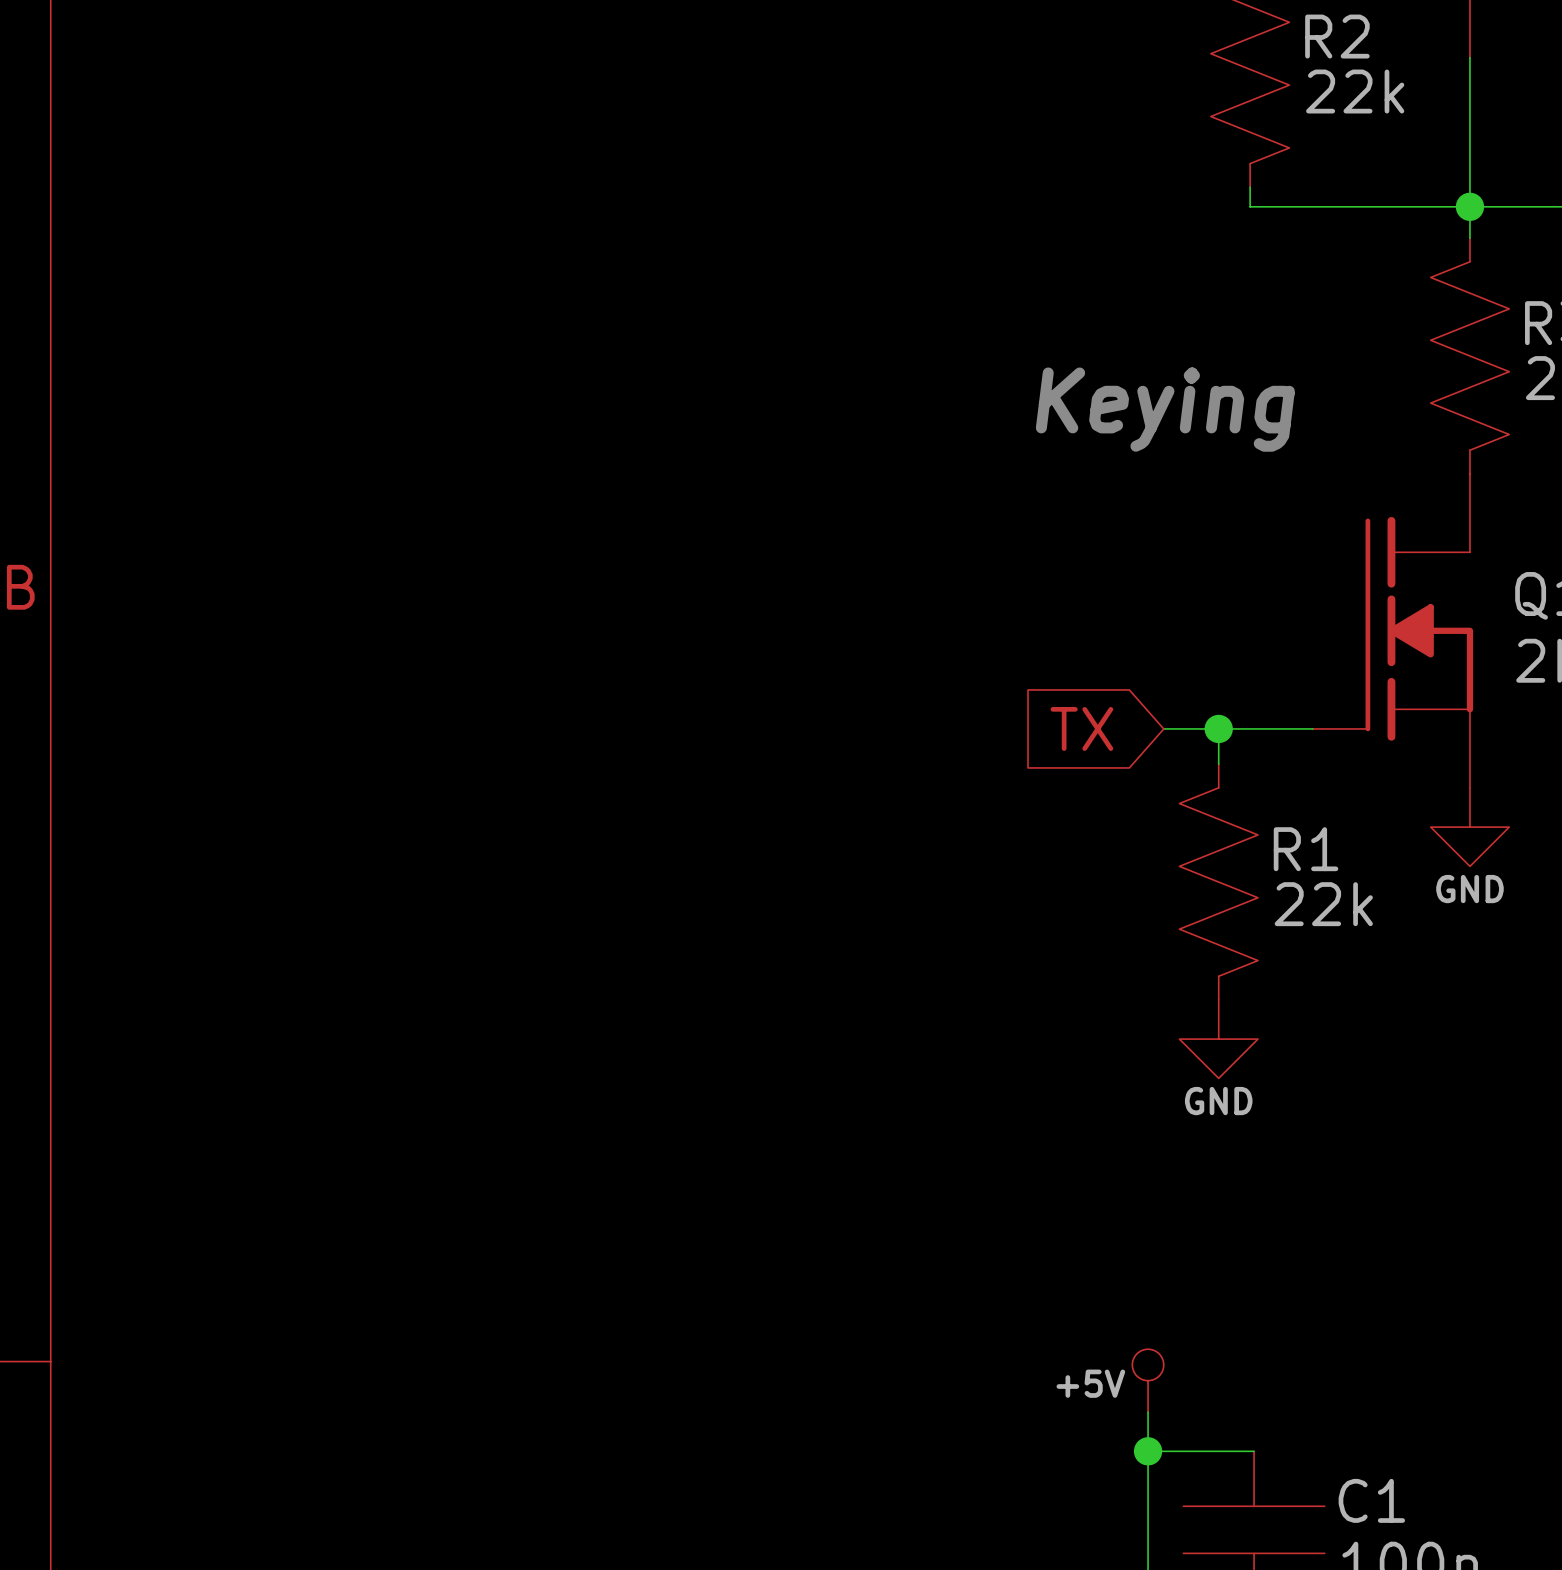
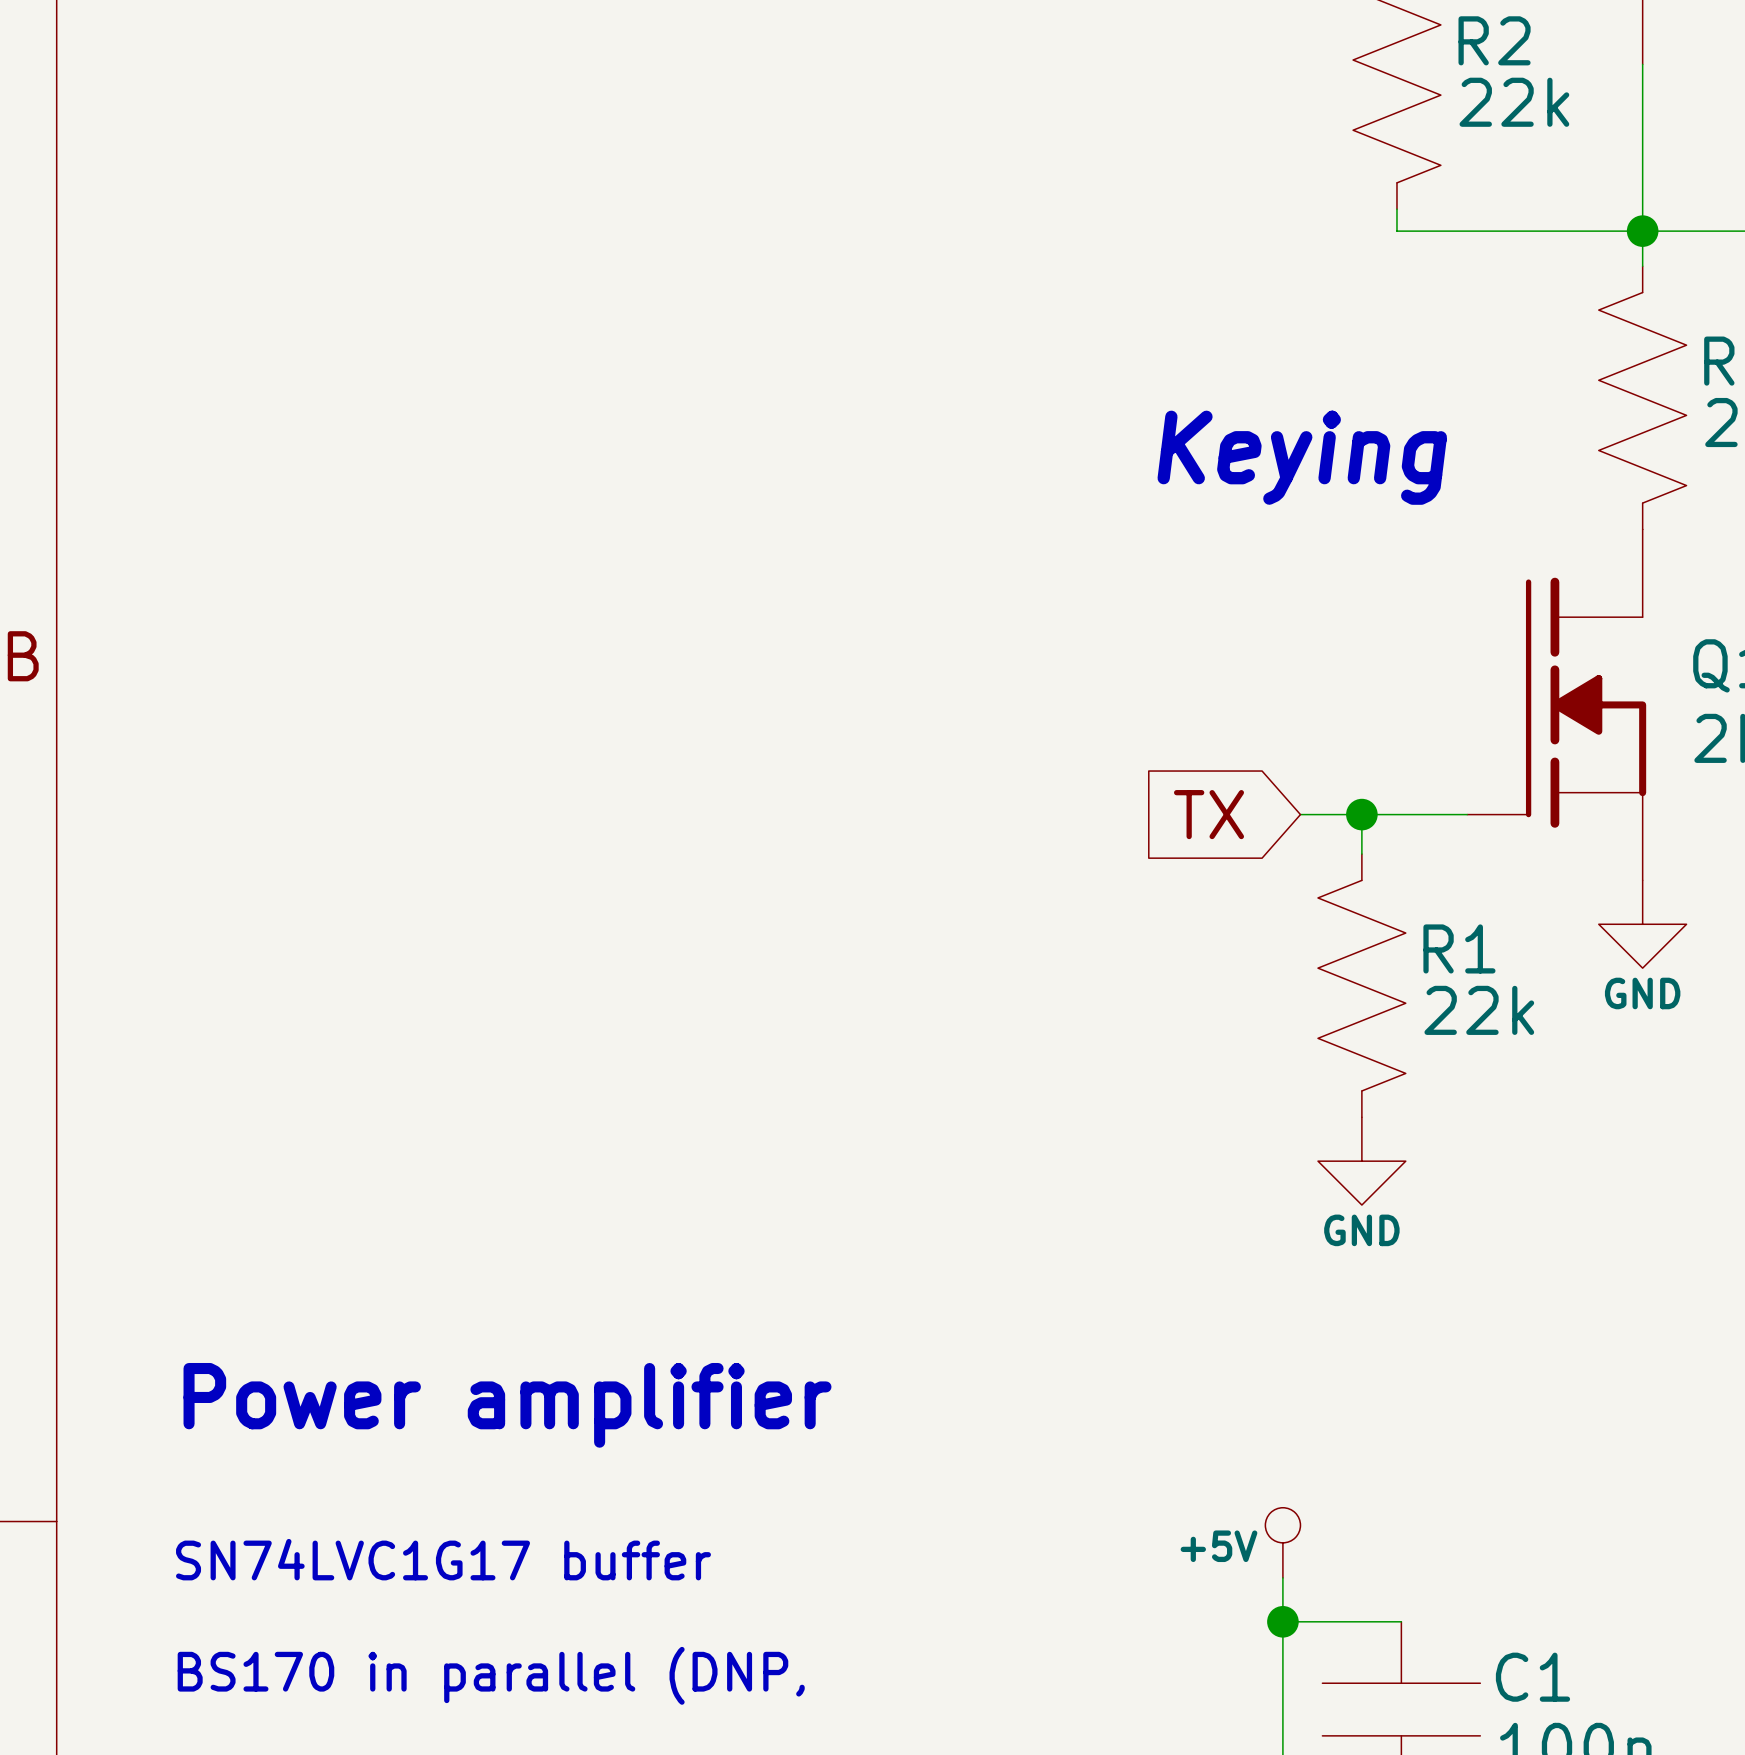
text: none -> Power amplifier (507, 1405)
text: none -> SN74LVC1G17 buffer (443, 1559)
text: none -> BS170 in parallel (DNP, (491, 1675)

